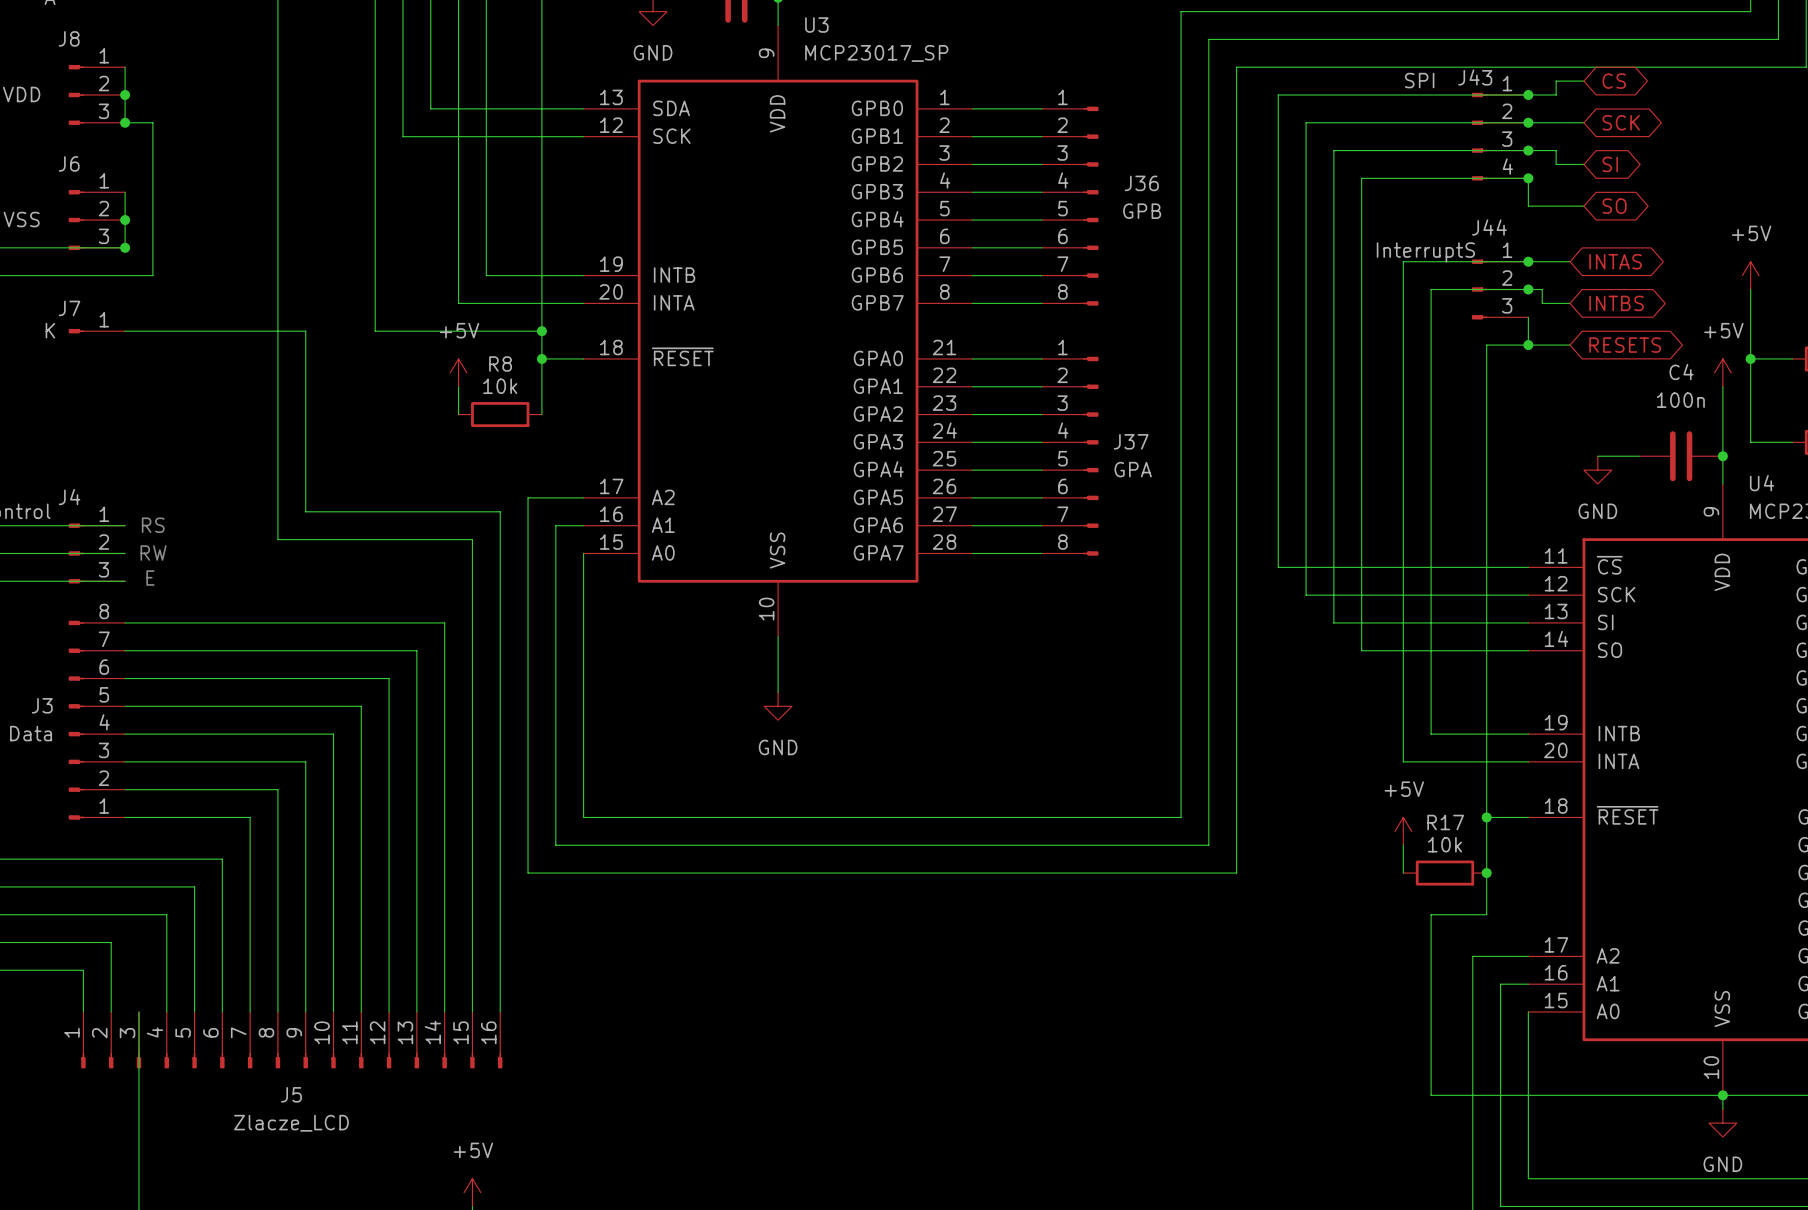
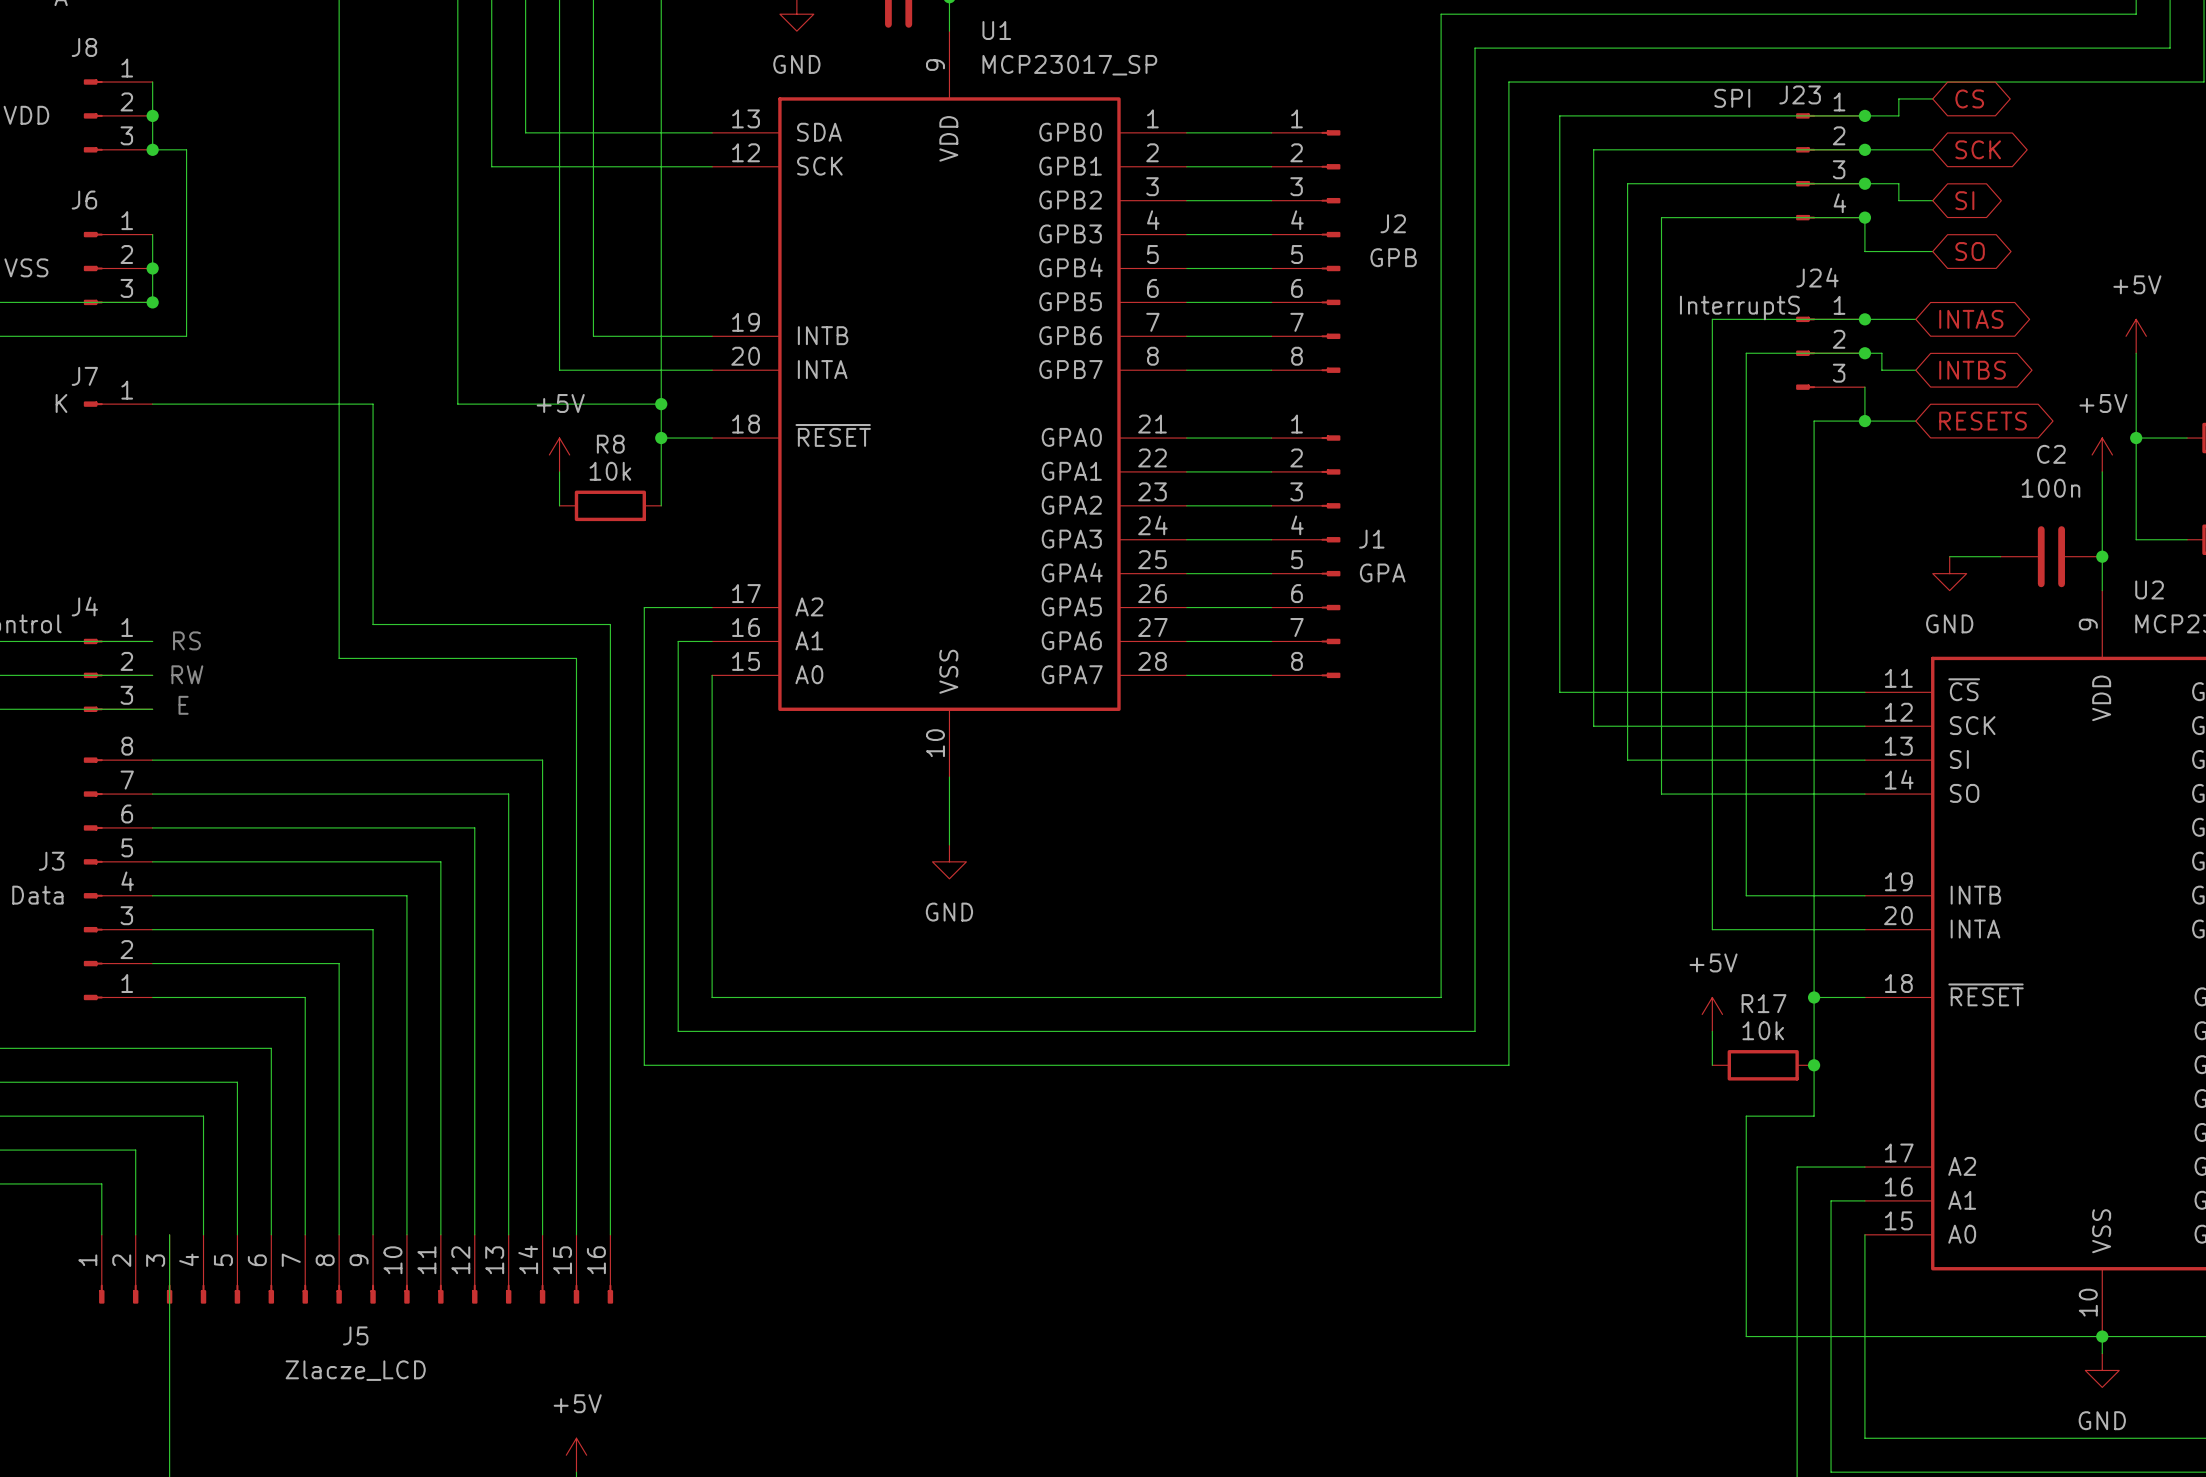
U3 name: U3 (816, 25) -> U1 (996, 30)
J43 name: J43 (1475, 77) -> J23 (1800, 94)
J36 name: J36 (1141, 183) -> J2 (1393, 223)
J44 name: J44 (1489, 227) -> J24 (1817, 277)
C4 name: C4 (1681, 372) -> C2 (2051, 454)
J37 name: J37 (1131, 441) -> J1 (1371, 539)
U4 name: U4 (1761, 483) -> U2 (2149, 589)

